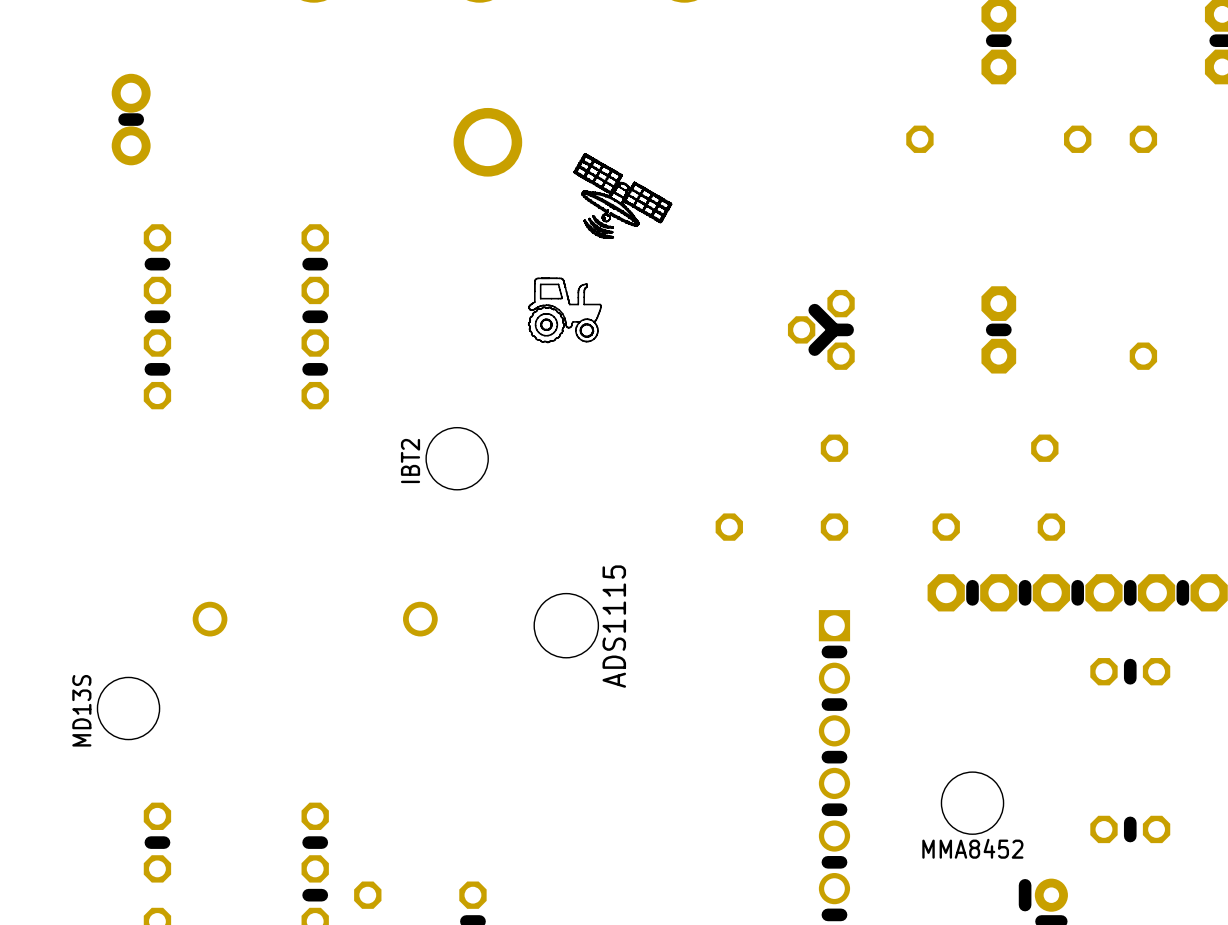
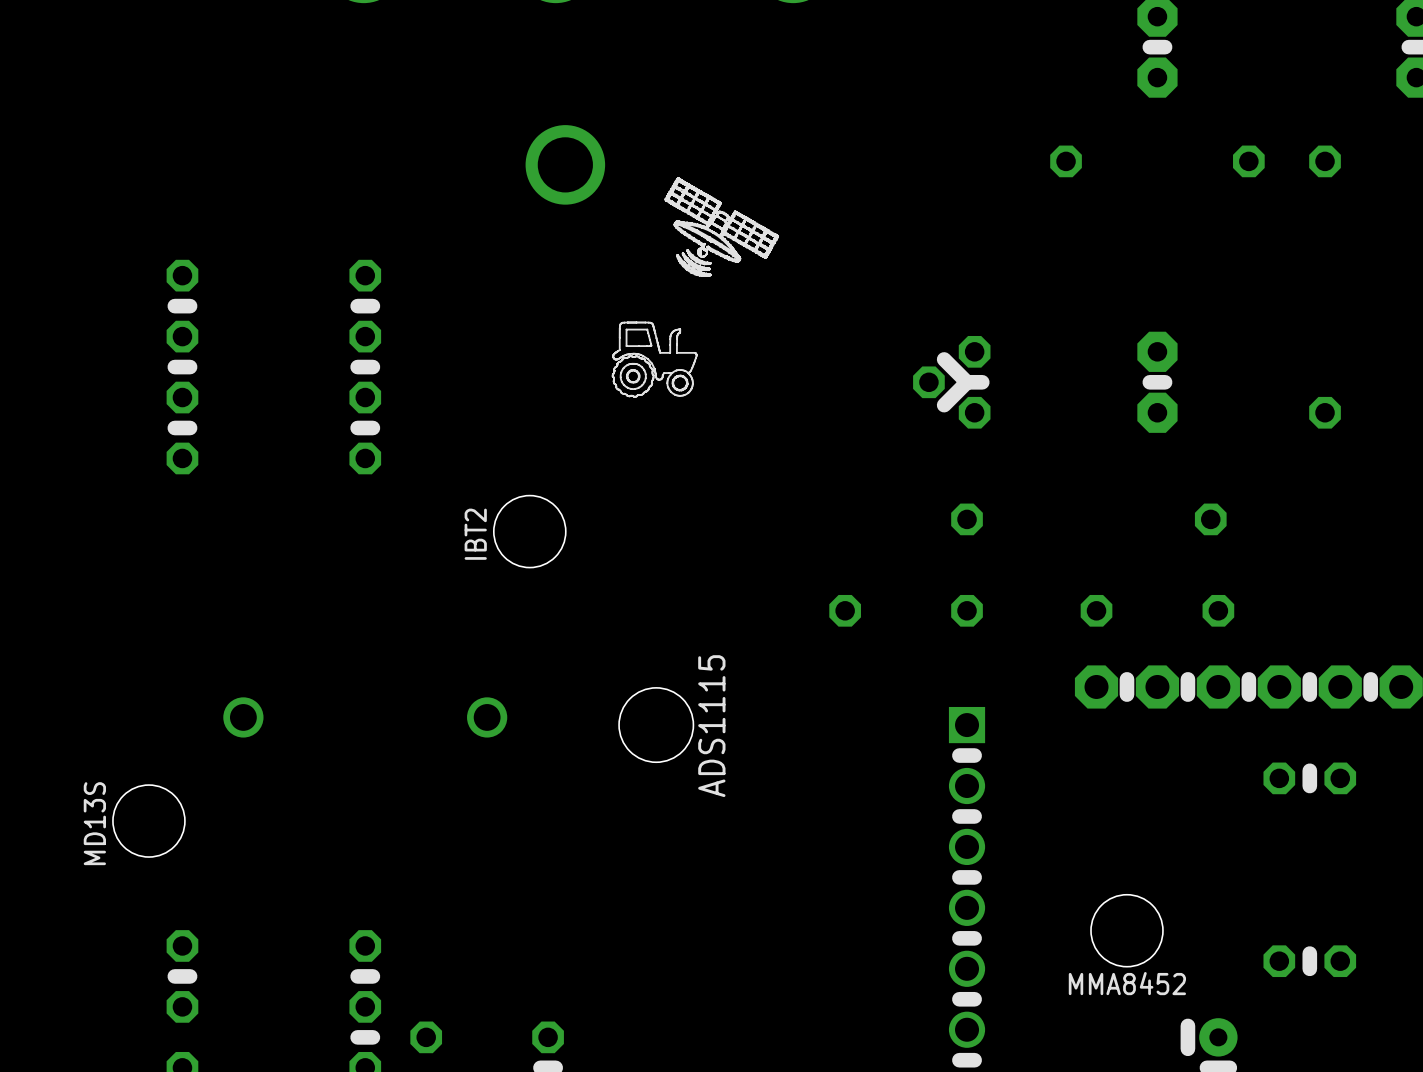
part: (131, 119) -> none
line: (137, 119) (124, 119) -> none

